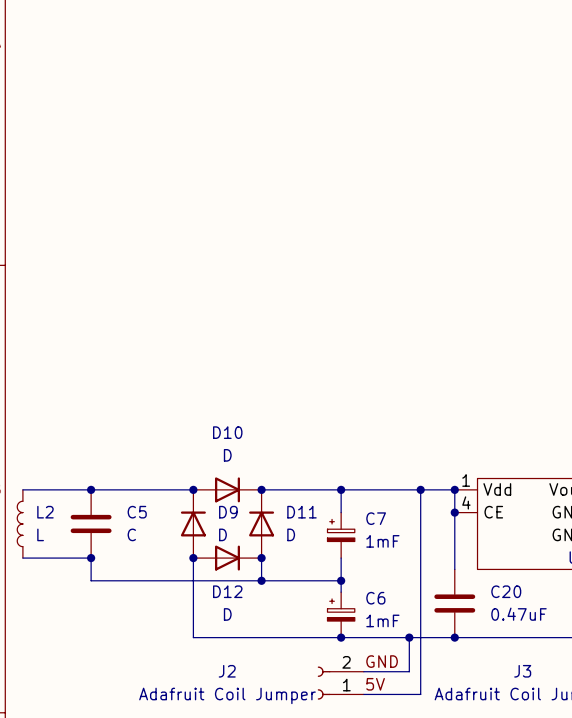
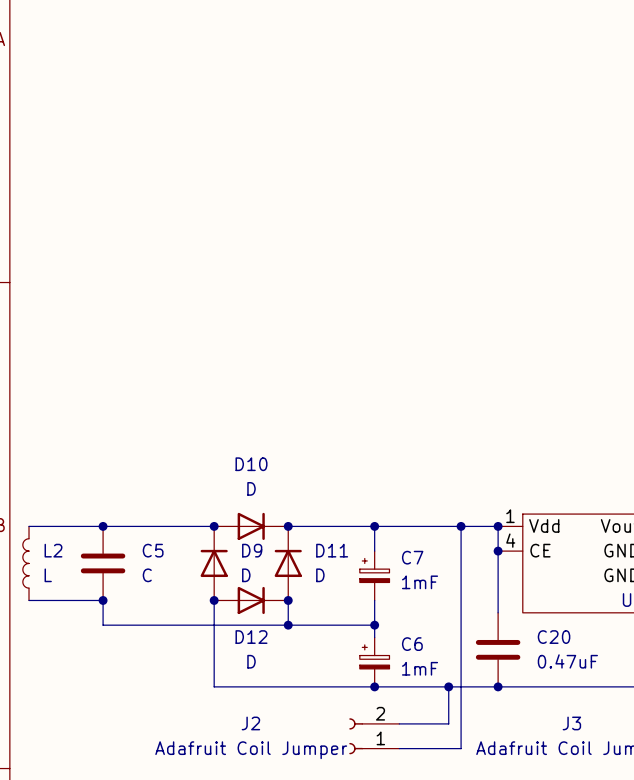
label: GND (382, 661) -> none
label: 5V (375, 684) -> none

